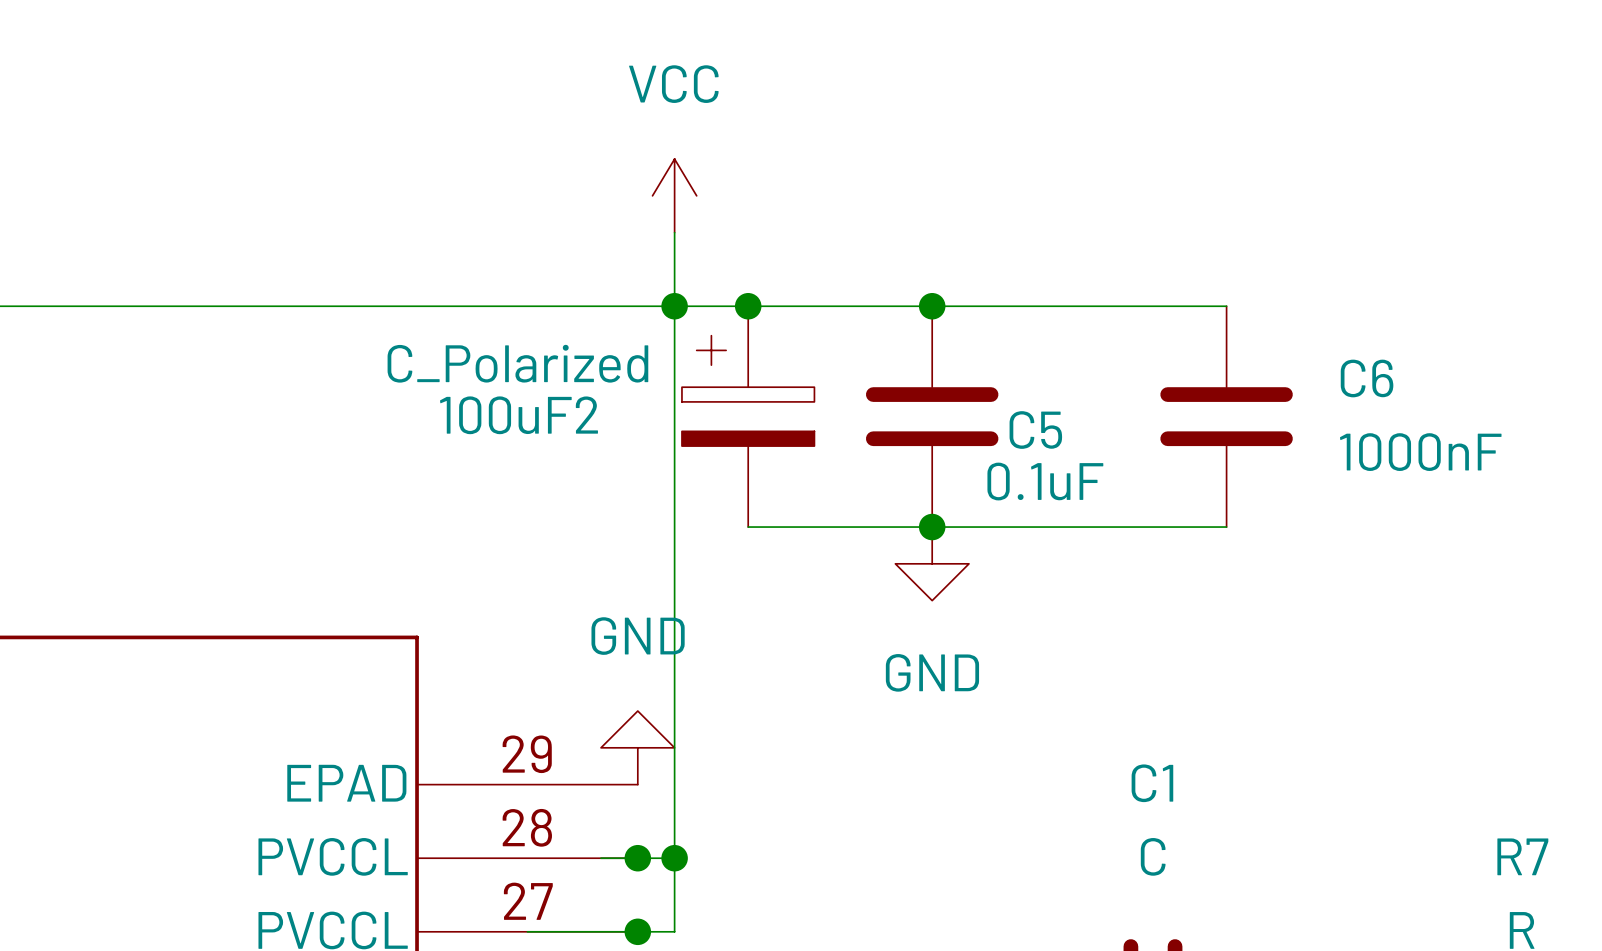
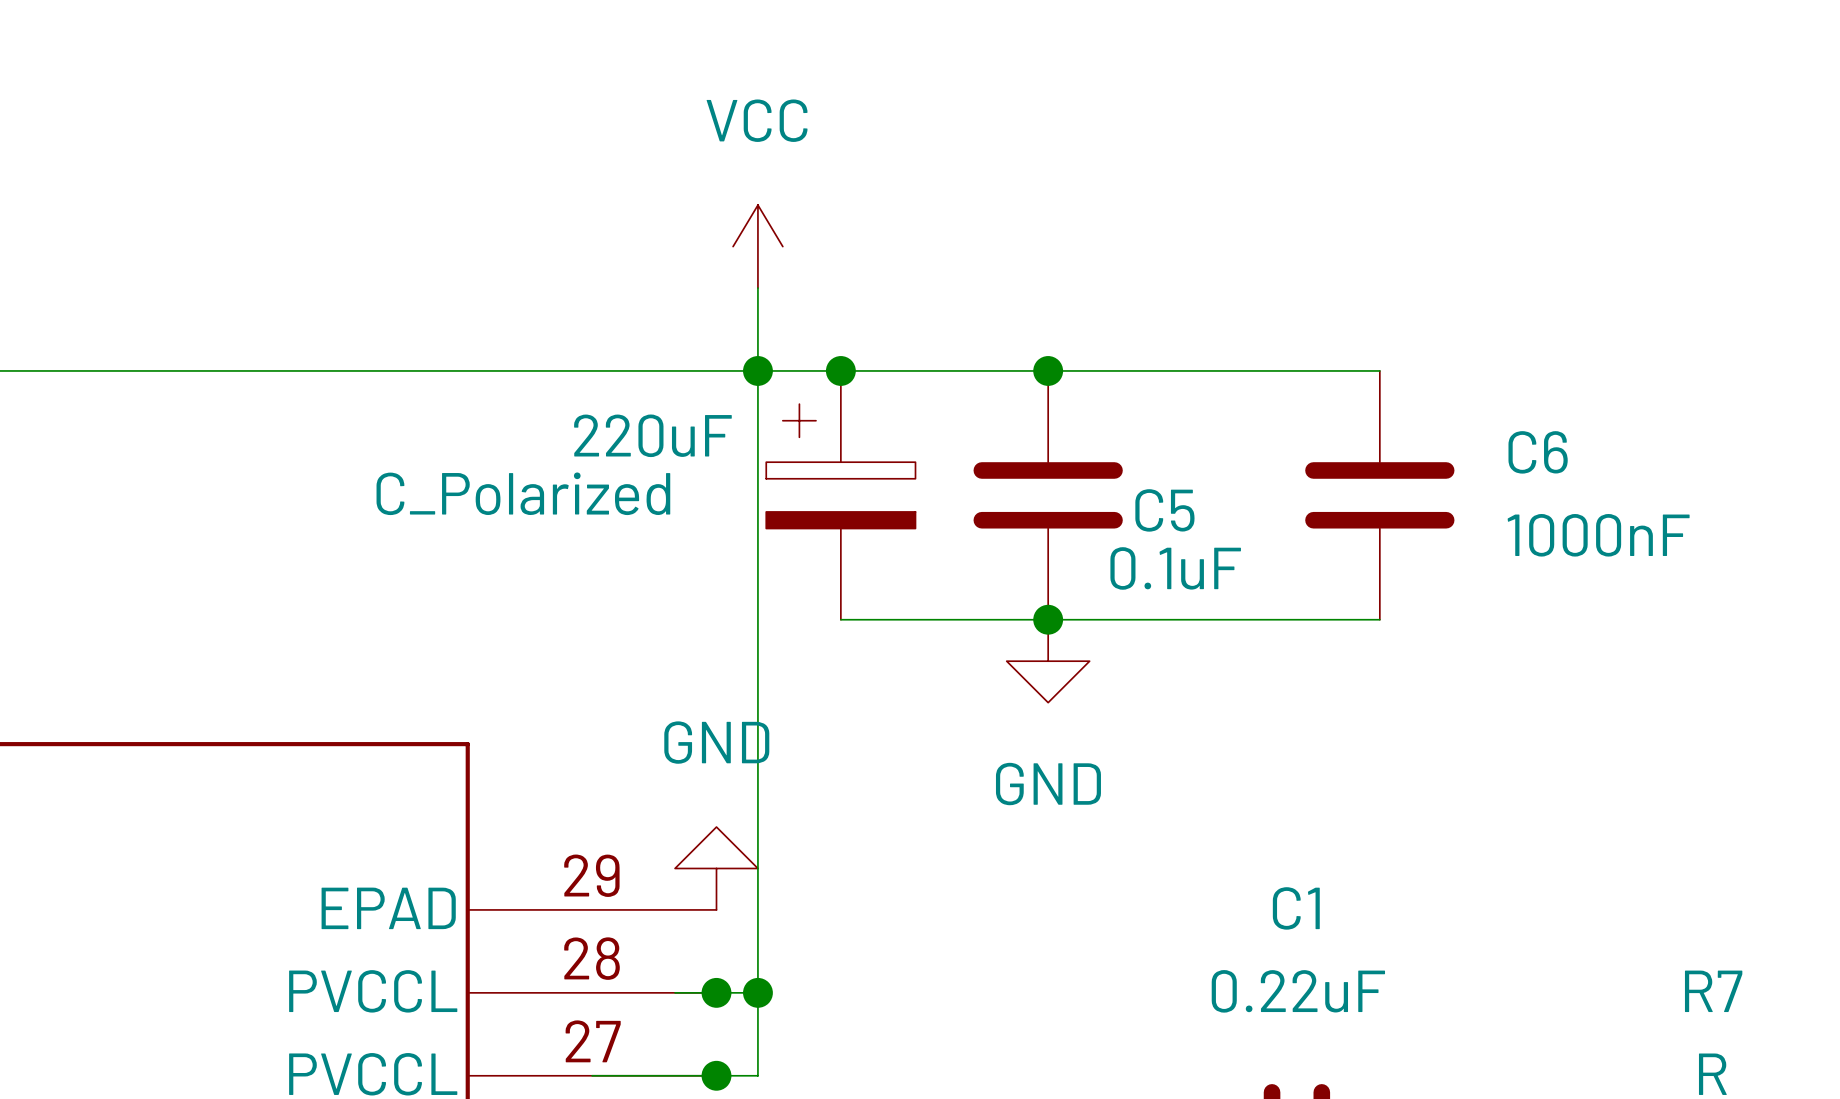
100uF2 value: C_Polarized (517, 363) -> 220uF (652, 435)
100uF2 name: 100uF2 (519, 415) -> C_Polarized (523, 493)
C1 value: C (1153, 856) -> 0.22uF (1298, 991)

